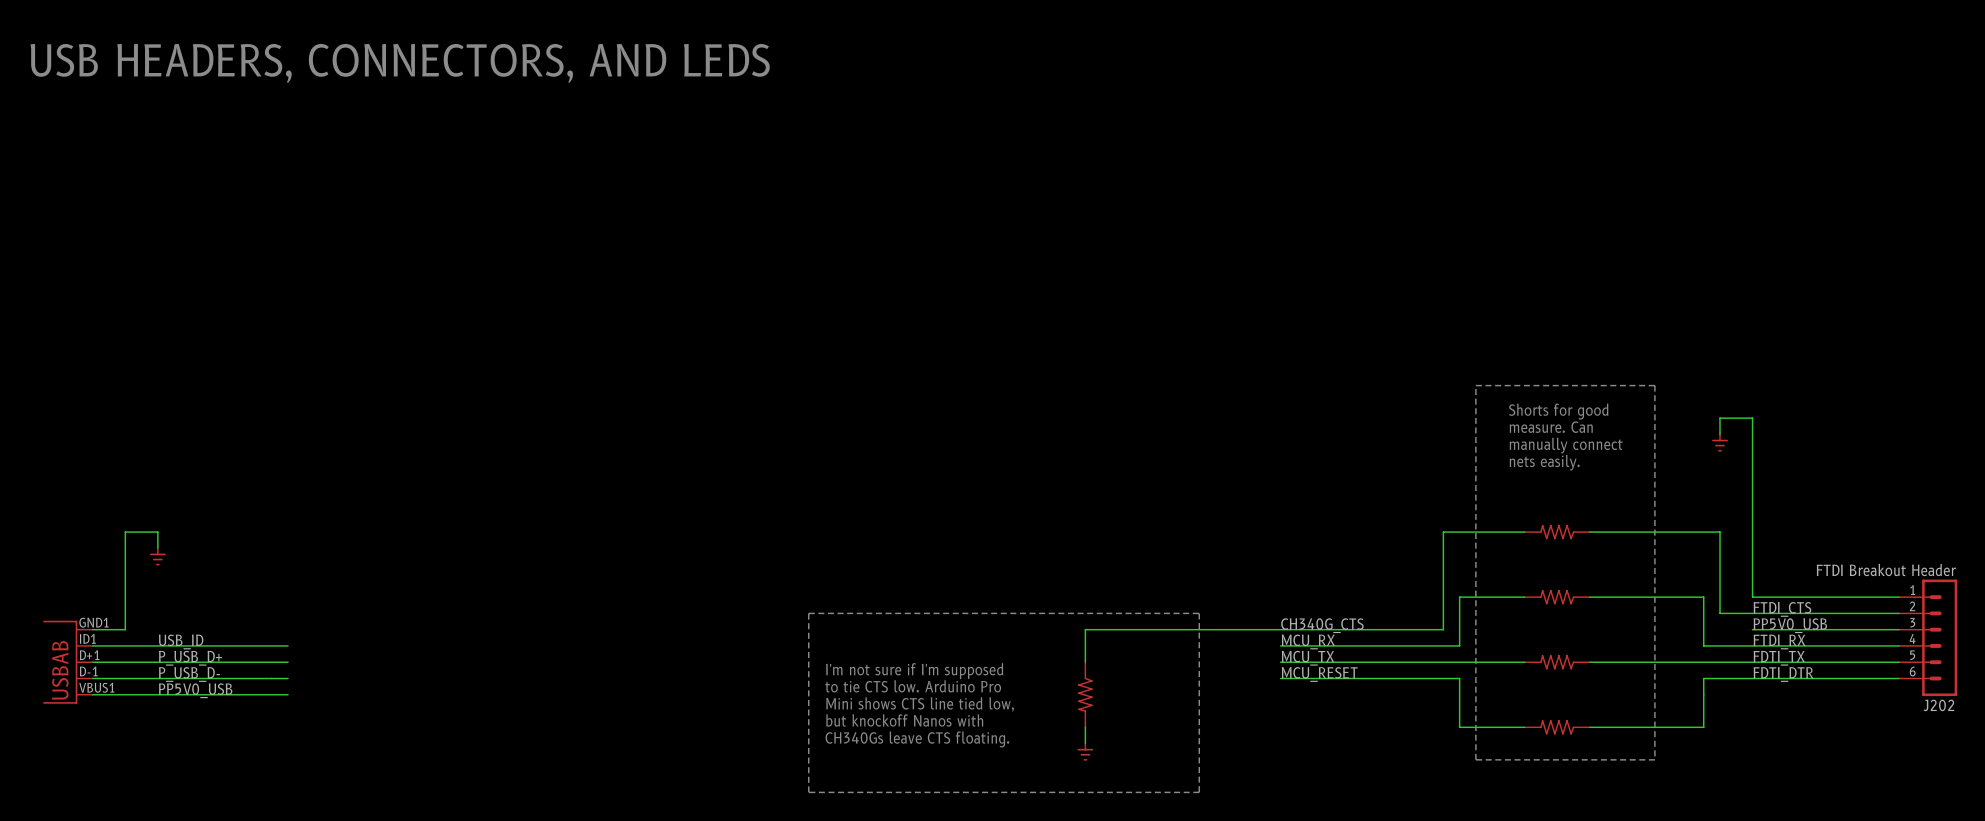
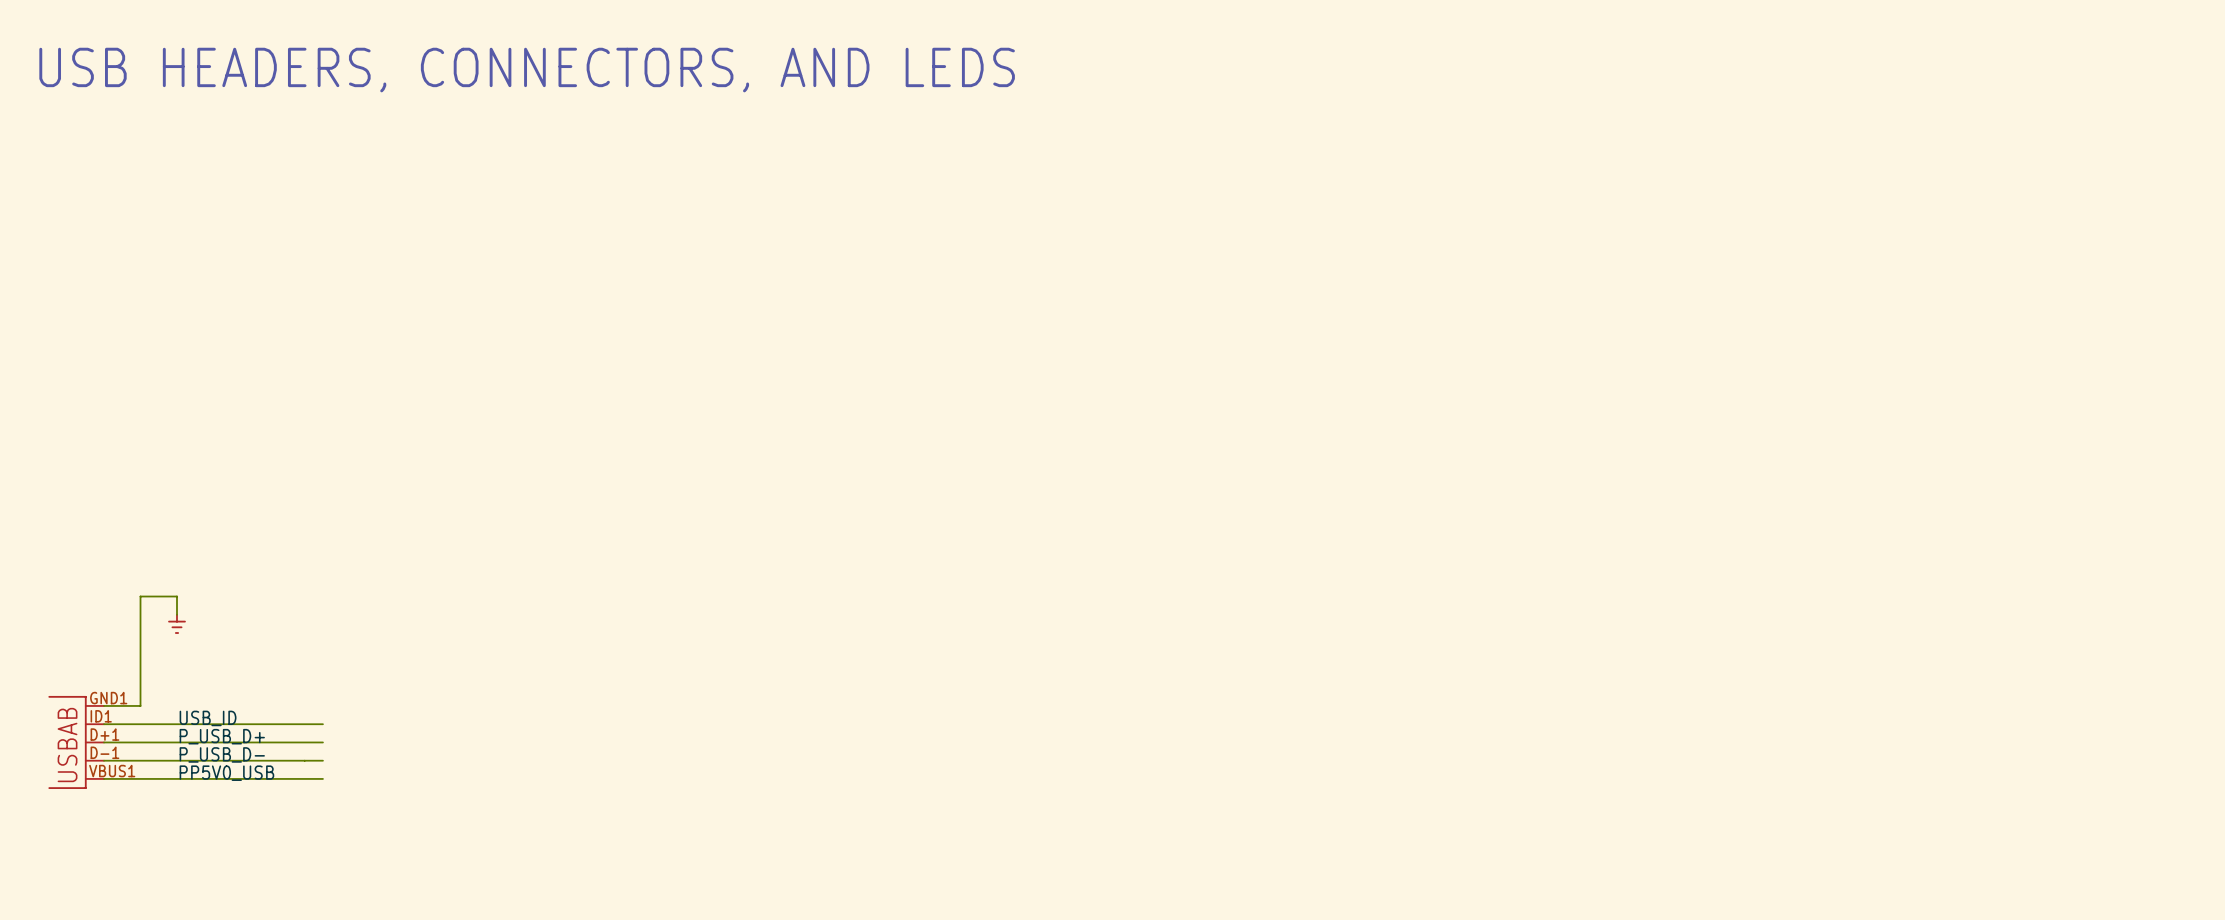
line: (1475, 385) (1475, 759) (1654, 759) (1654, 385) (1475, 385) -> none
text: Shorts for good (1558, 411) -> none
text: measure. Can (1551, 427) -> none
wire: (1719, 434) (1719, 418) (1752, 418) (1752, 597) (1898, 597) -> none
power symbol: (1719, 442) -> none
text: manually connect (1566, 445) -> none
text: nets easily. (1544, 462) -> none
wire: (1524, 532) (1443, 532) (1443, 629) (1085, 629) (1085, 662) -> none
part: (1557, 532) -> none
wire: (1589, 532) (1719, 532) (1719, 613) (1898, 613) -> none
wire: (1524, 597) (1459, 597) (1459, 645) (1280, 645) -> none
part: (1557, 597) -> none
wire: (1589, 597) (1703, 597) (1703, 645) (1898, 645) -> none
label: FTDI_CTS (1782, 609) -> none
line: (808, 613) (808, 792) (1199, 792) (1199, 613) (808, 613) -> none
label: CH340G_CTS (1322, 625) -> none
label: PP5V0_USB (1790, 625) -> none
wire: (1752, 629) (1898, 629) -> none
J202: FTDI Breakout Header (1928, 637) -> none
label: MCU_RX (1308, 641) -> none
label: FTDI_RX (1779, 641) -> none
label: MCU_TX (1307, 658) -> none
label: FDTI_TX (1779, 658) -> none
wire: (1280, 662) (1524, 662) -> none
part: (1557, 662) -> none
wire: (1589, 662) (1898, 662) -> none
text: I'm not sure if I'm supposed (914, 671) -> none
label: MCU_RESET (1319, 674) -> none
label: FDTI_DTR (1783, 674) -> none
wire: (1280, 678) (1459, 678) (1459, 727) (1524, 727) -> none
wire: (1898, 678) (1703, 678) (1703, 727) (1589, 727) -> none
text: to tie CTS low. Arduino Pro (913, 686) -> none
part: (1085, 694) -> none
text: Mini shows CTS line tied low, (920, 704) -> none
text: but knockoff Nanos with (904, 720) -> none
wire: (1085, 727) (1085, 743) -> none
part: (1557, 727) -> none
text: CH340Gs leave CTS floating. (917, 739) -> none
power symbol: (1085, 751) -> none

